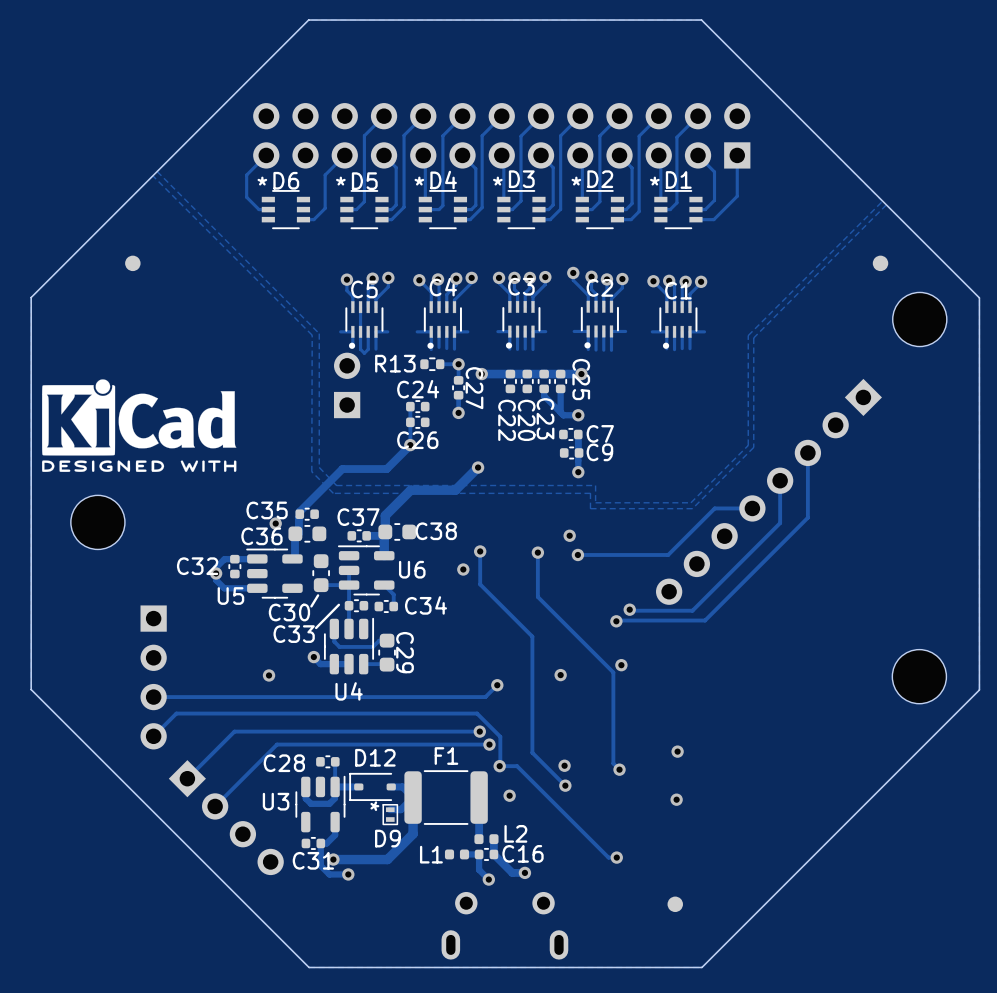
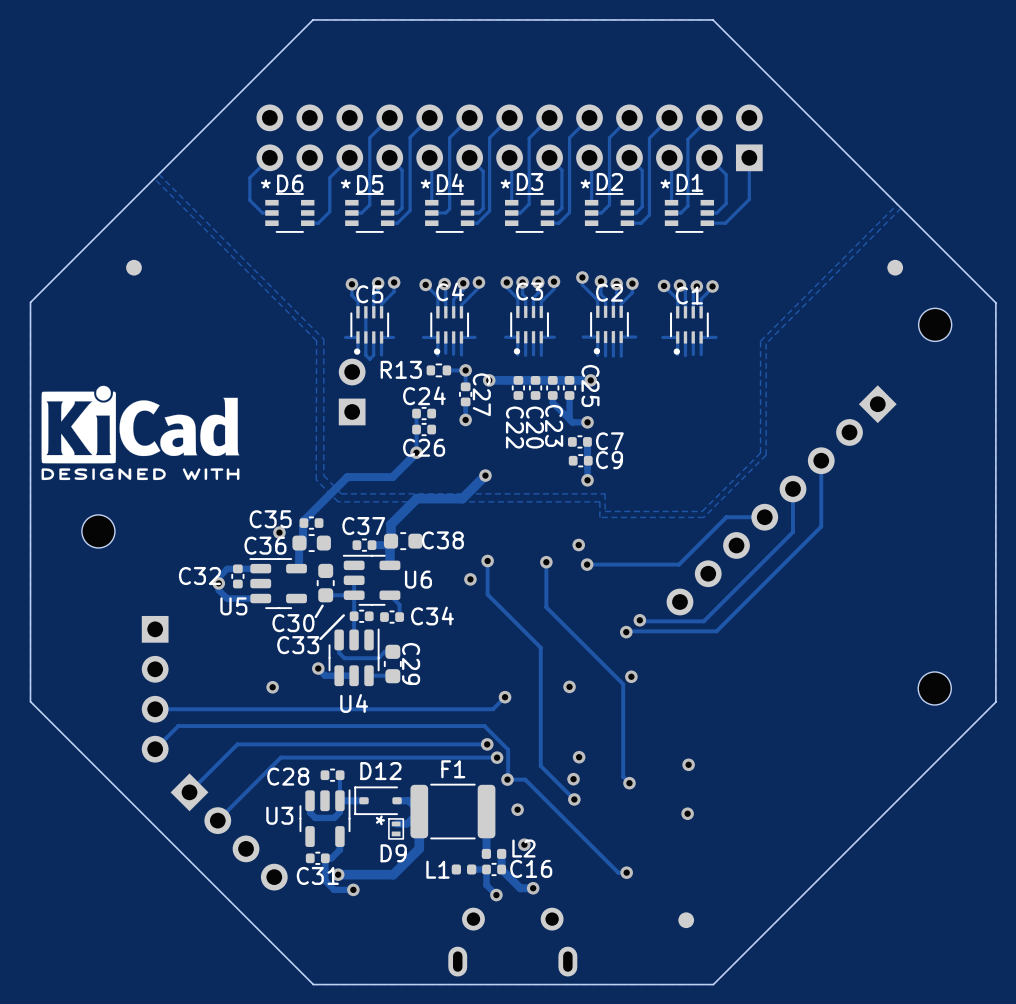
part footprint: [892, 292, 947, 347] -> [918, 308, 952, 342]
part footprint: [70, 495, 125, 550] -> [81, 514, 115, 548]
part footprint: [892, 649, 947, 704] -> [918, 671, 952, 705]
via: none -> (579, 757)
via: none -> (524, 844)

